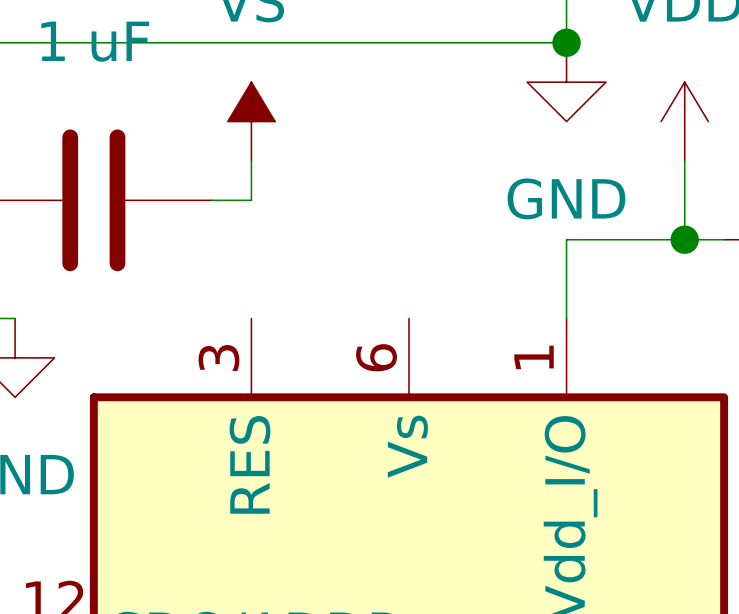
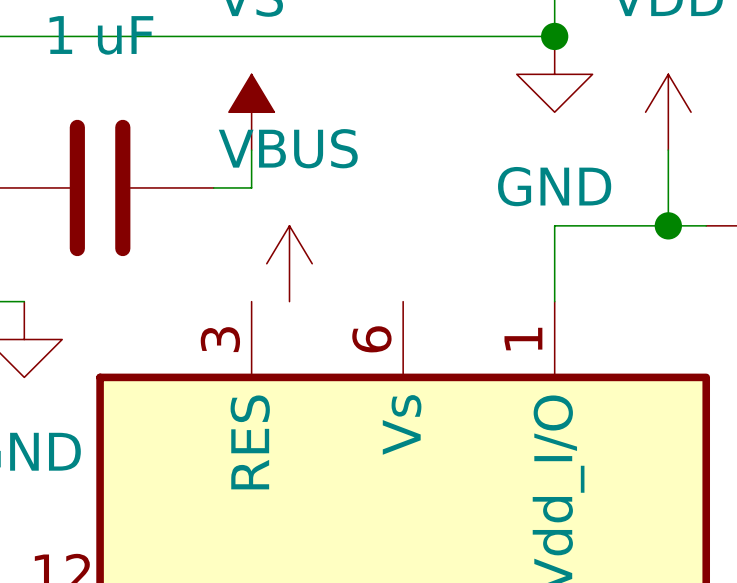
power symbol: none -> VBUS (289, 263)

